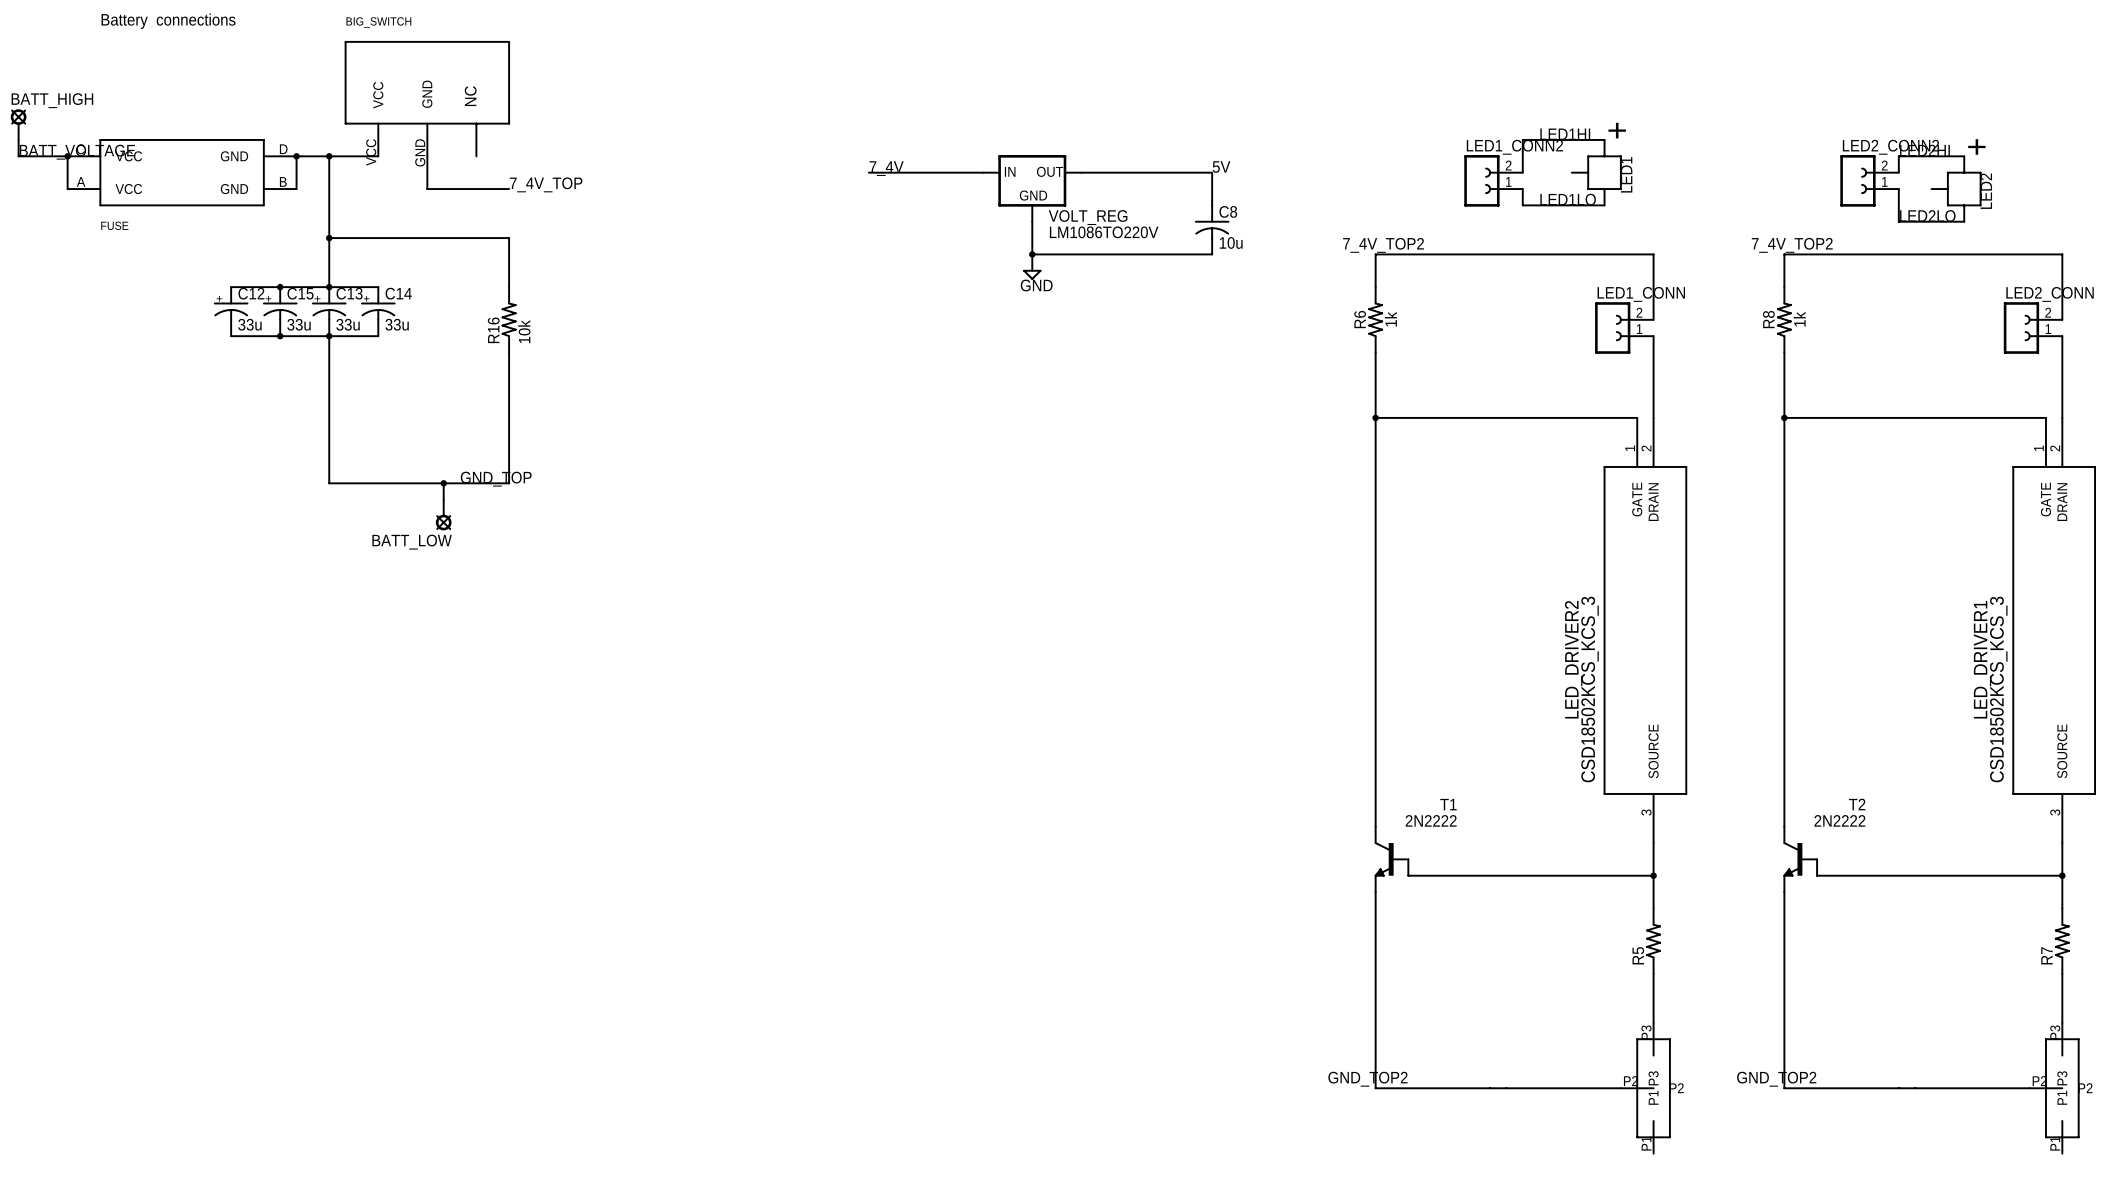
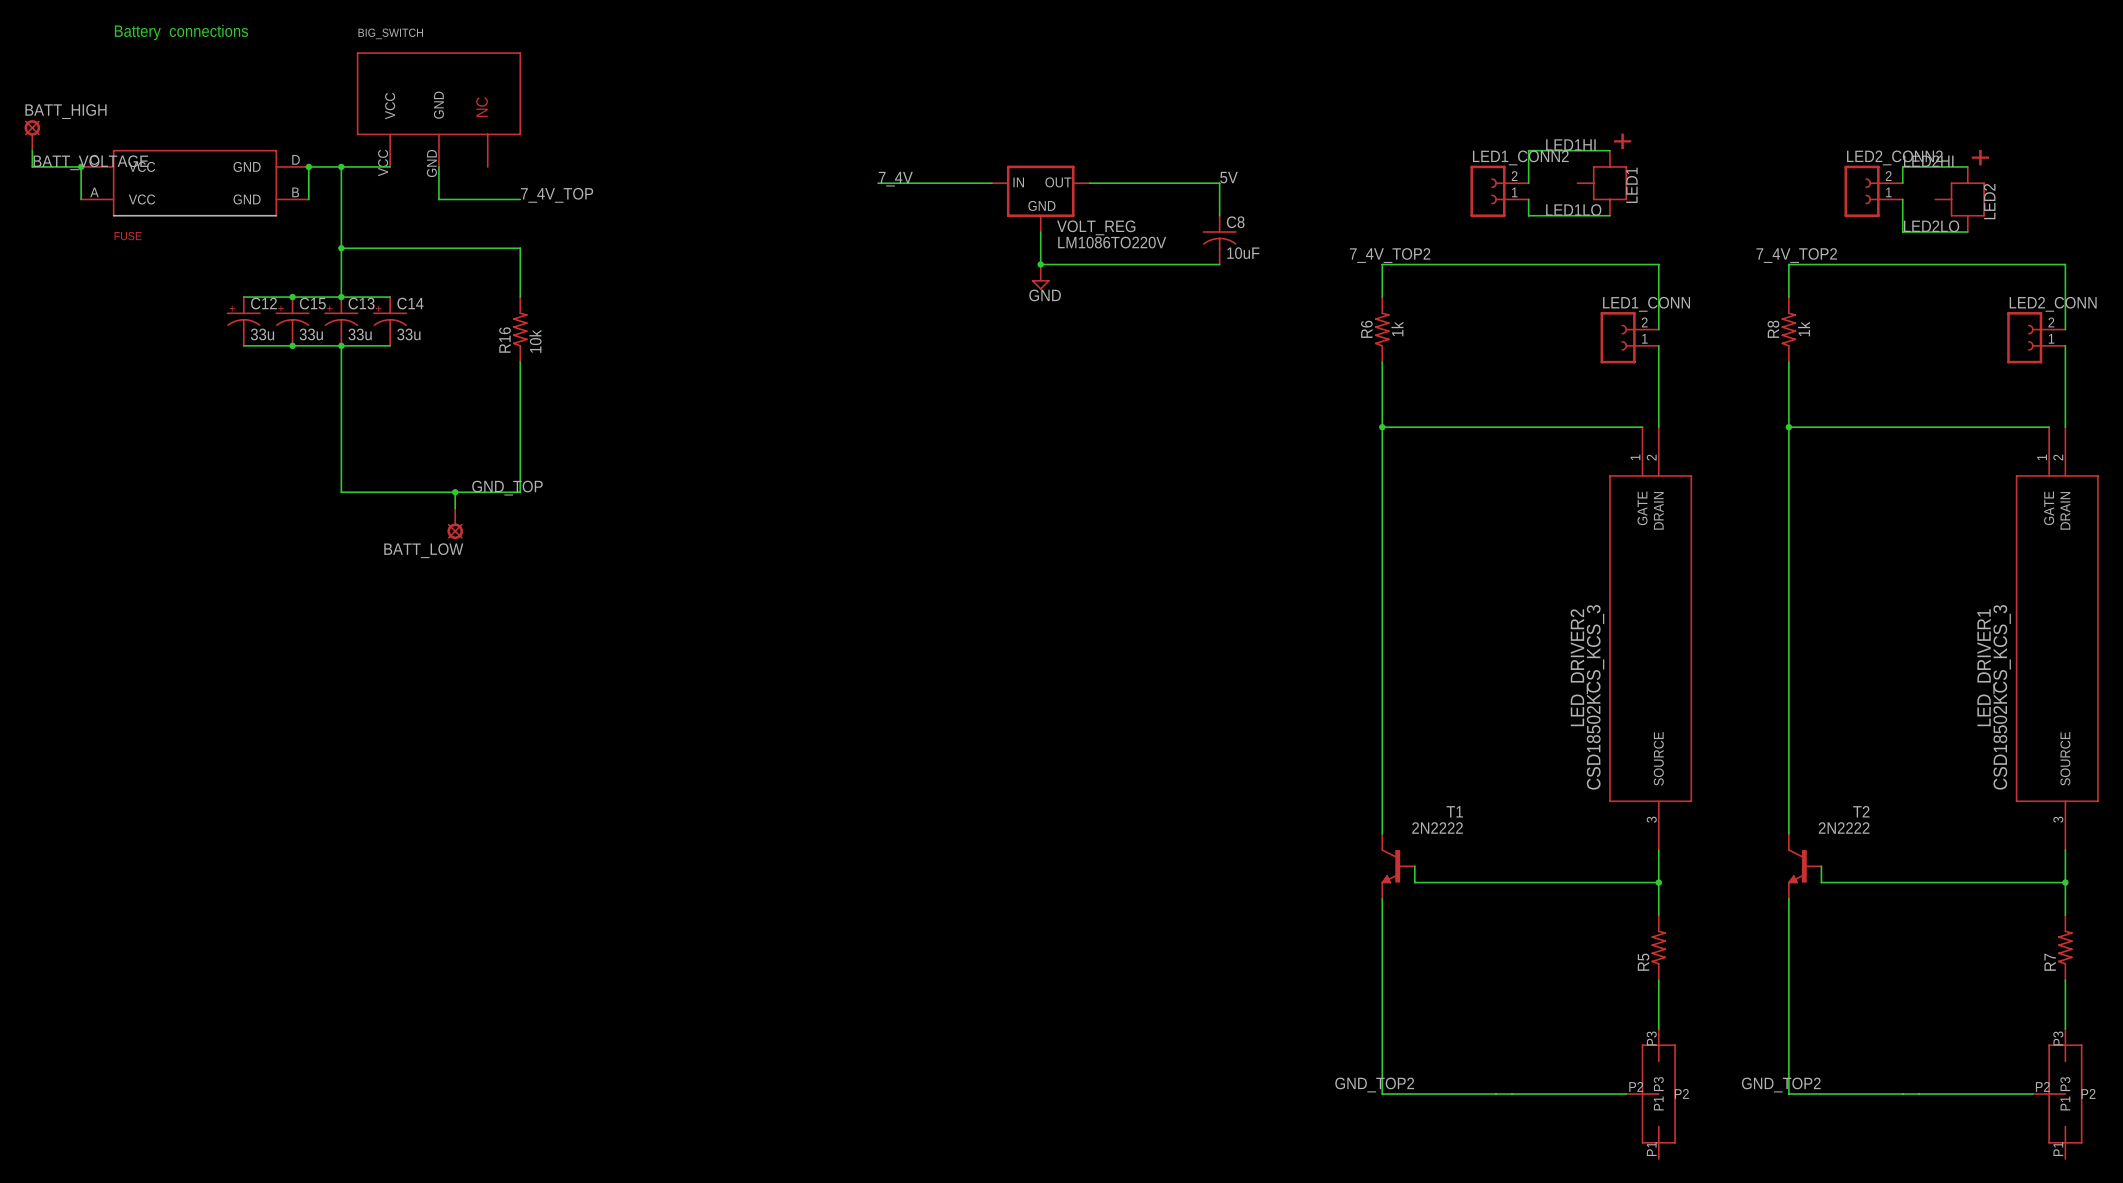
C8 value: 10u (1231, 242) -> 10uF (1243, 253)

